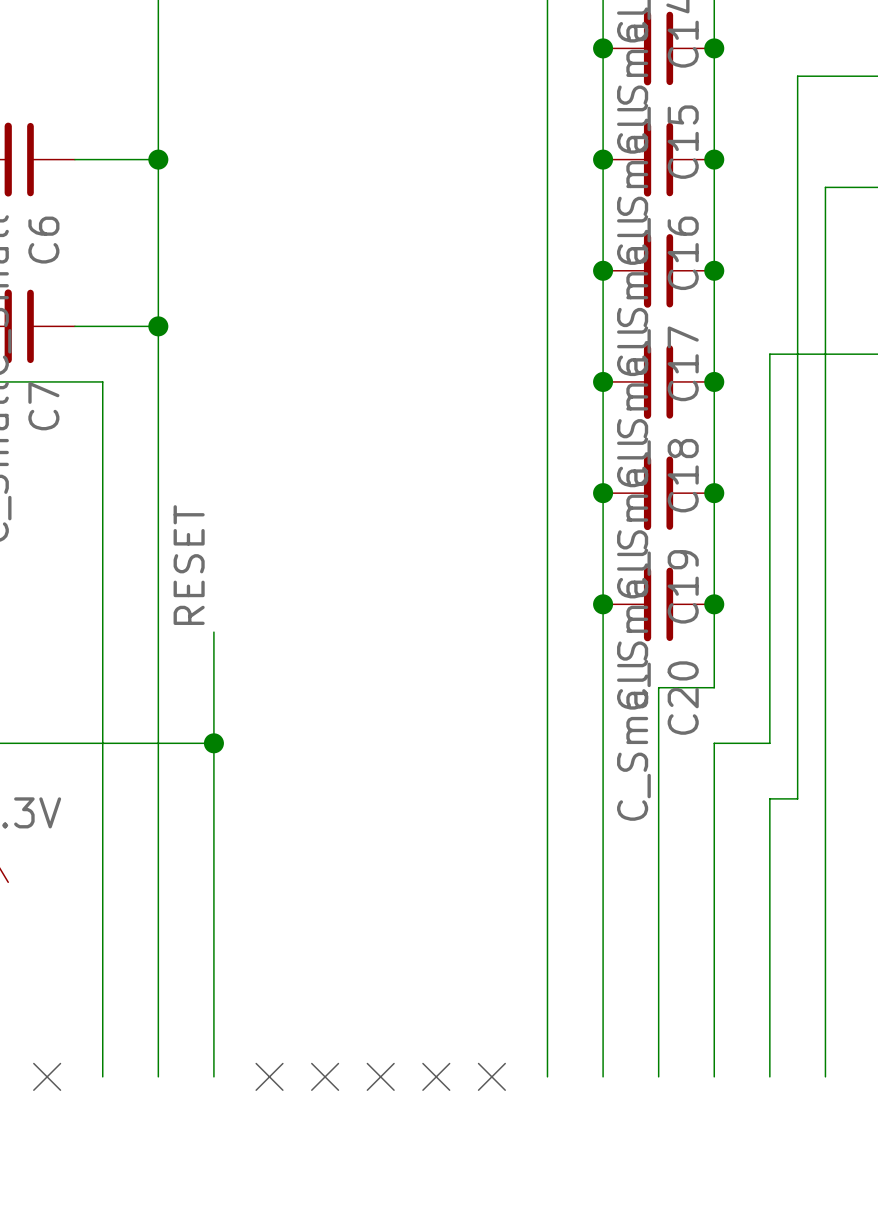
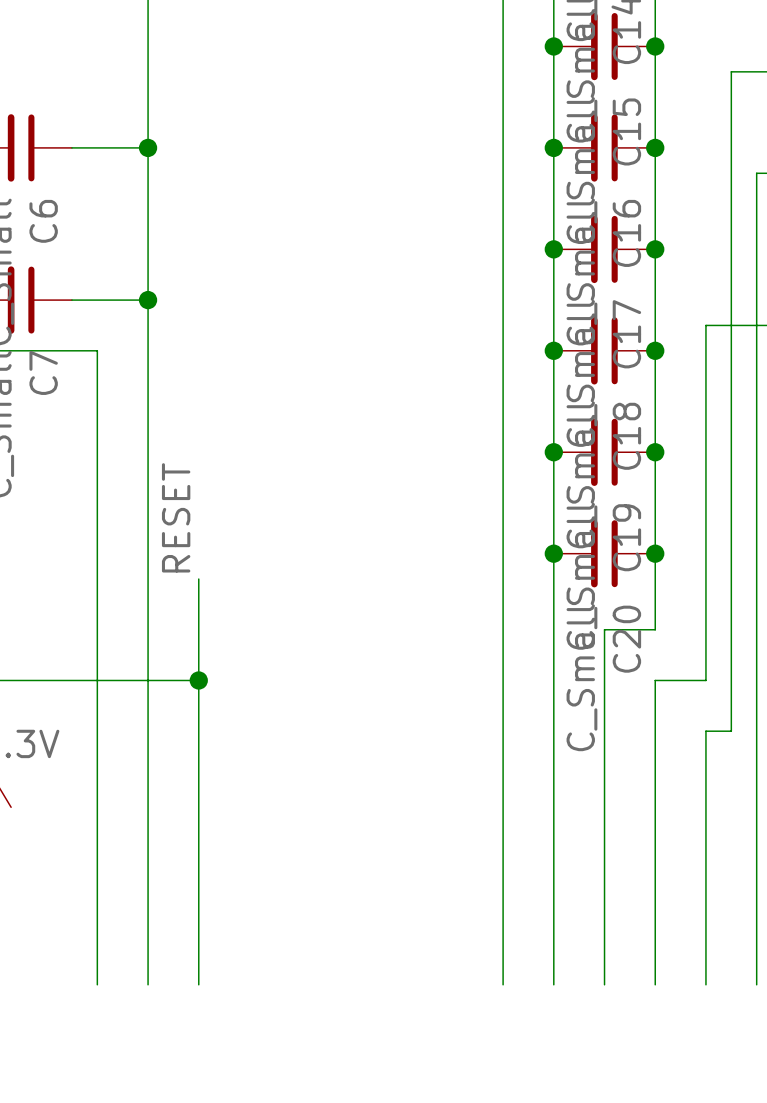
no-connect mark: (47, 1076) -> none
no-connect mark: (269, 1076) -> none
no-connect mark: (325, 1076) -> none
no-connect mark: (380, 1076) -> none
no-connect mark: (436, 1076) -> none
no-connect mark: (491, 1076) -> none

